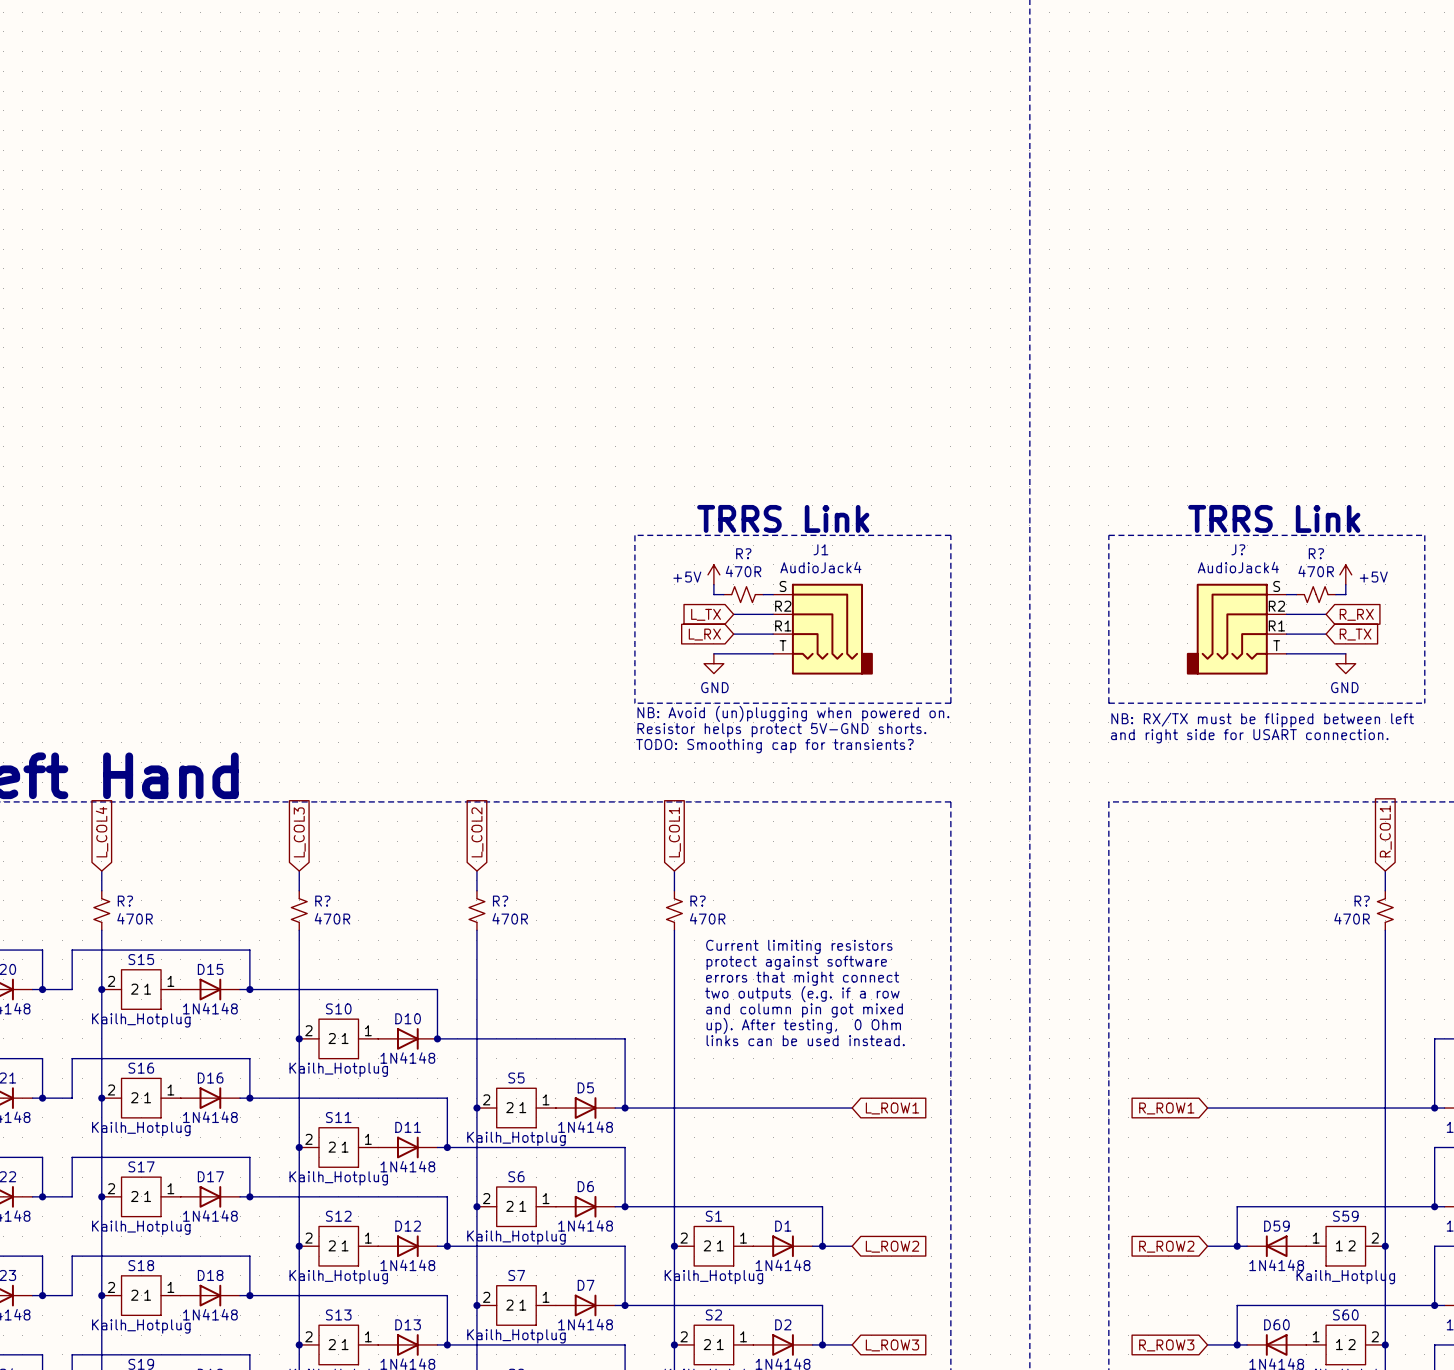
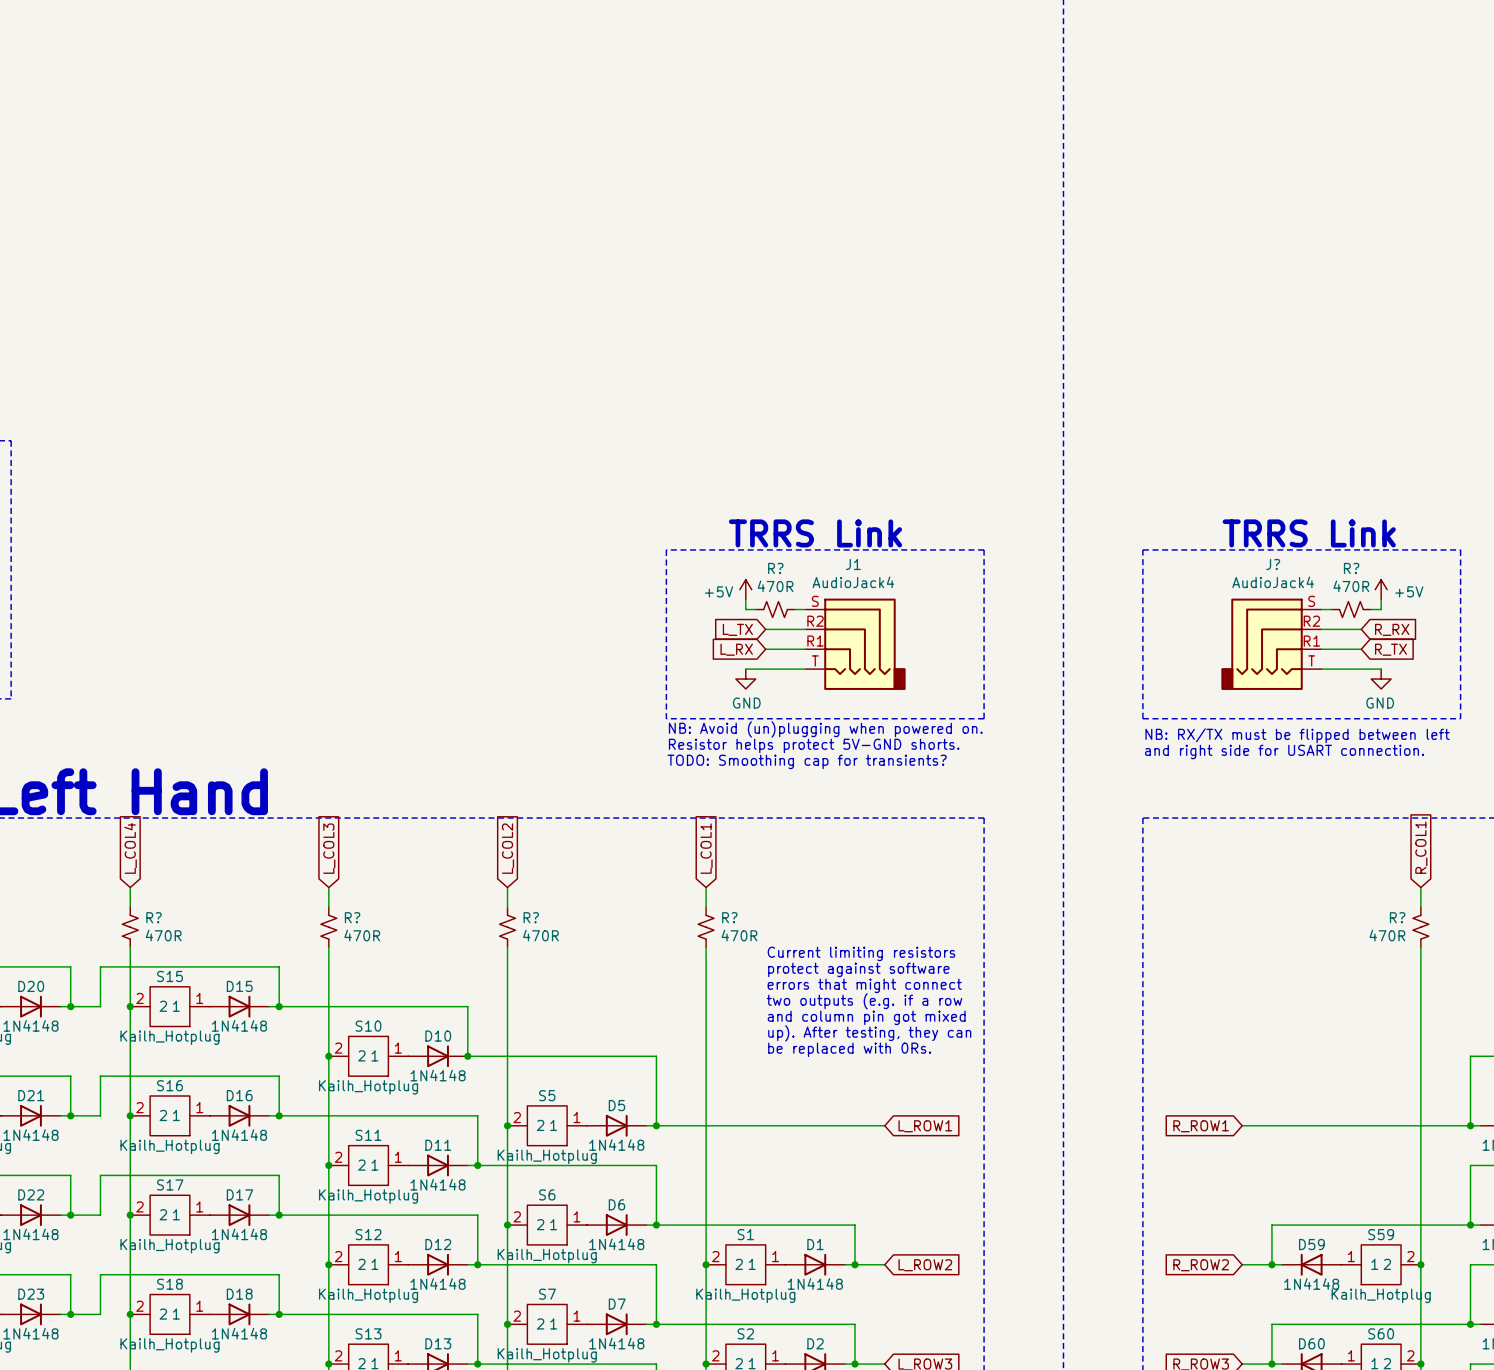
text position: Current limiting resistors (799, 946) -> Current limiting resistors (861, 953)
text position: protect against software (796, 962) -> protect against software (858, 969)
text position: errors that might connect (802, 978) -> errors that might connect (864, 985)
text position: two outputs (e.g. if a row (802, 994) -> two outputs (e.g. if a row (864, 1001)
text position: and column pin got mixed (804, 1010) -> and column pin got mixed (866, 1017)
text: up). After testing, 0 Ohm (803, 1025) -> up). After testing, they can (869, 1033)
text: none -> be replaced with 0Rs. (849, 1049)
text: links can be used instead. (805, 1040) -> none

